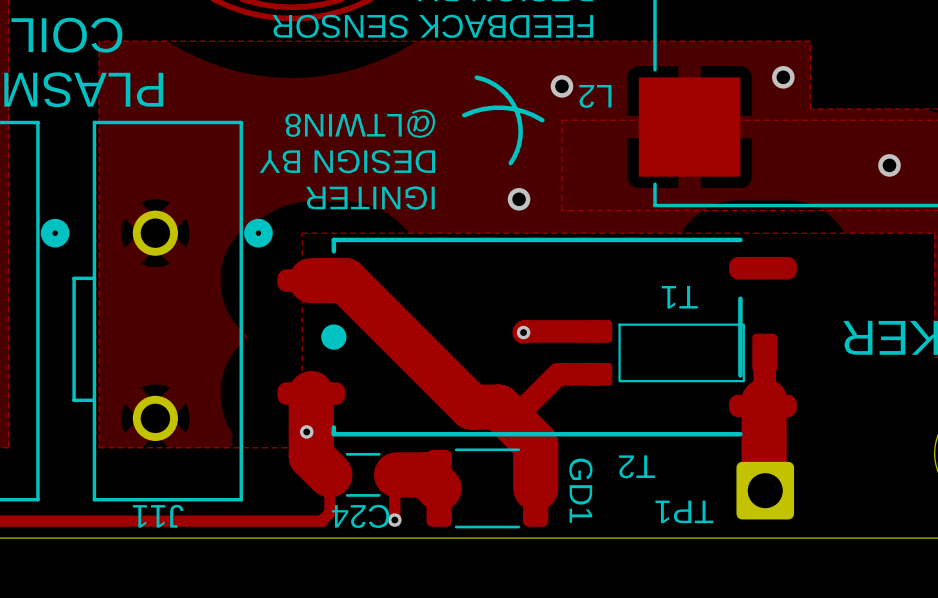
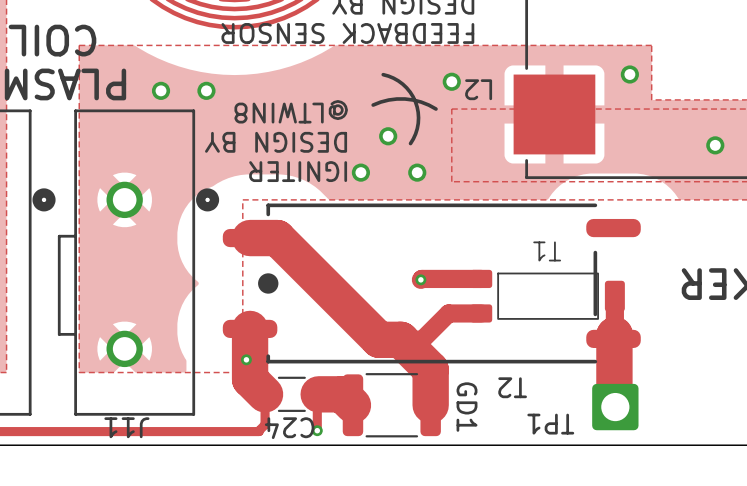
via: none -> (161, 90)
via: none -> (206, 90)
via: none -> (388, 136)
via: none -> (360, 172)

